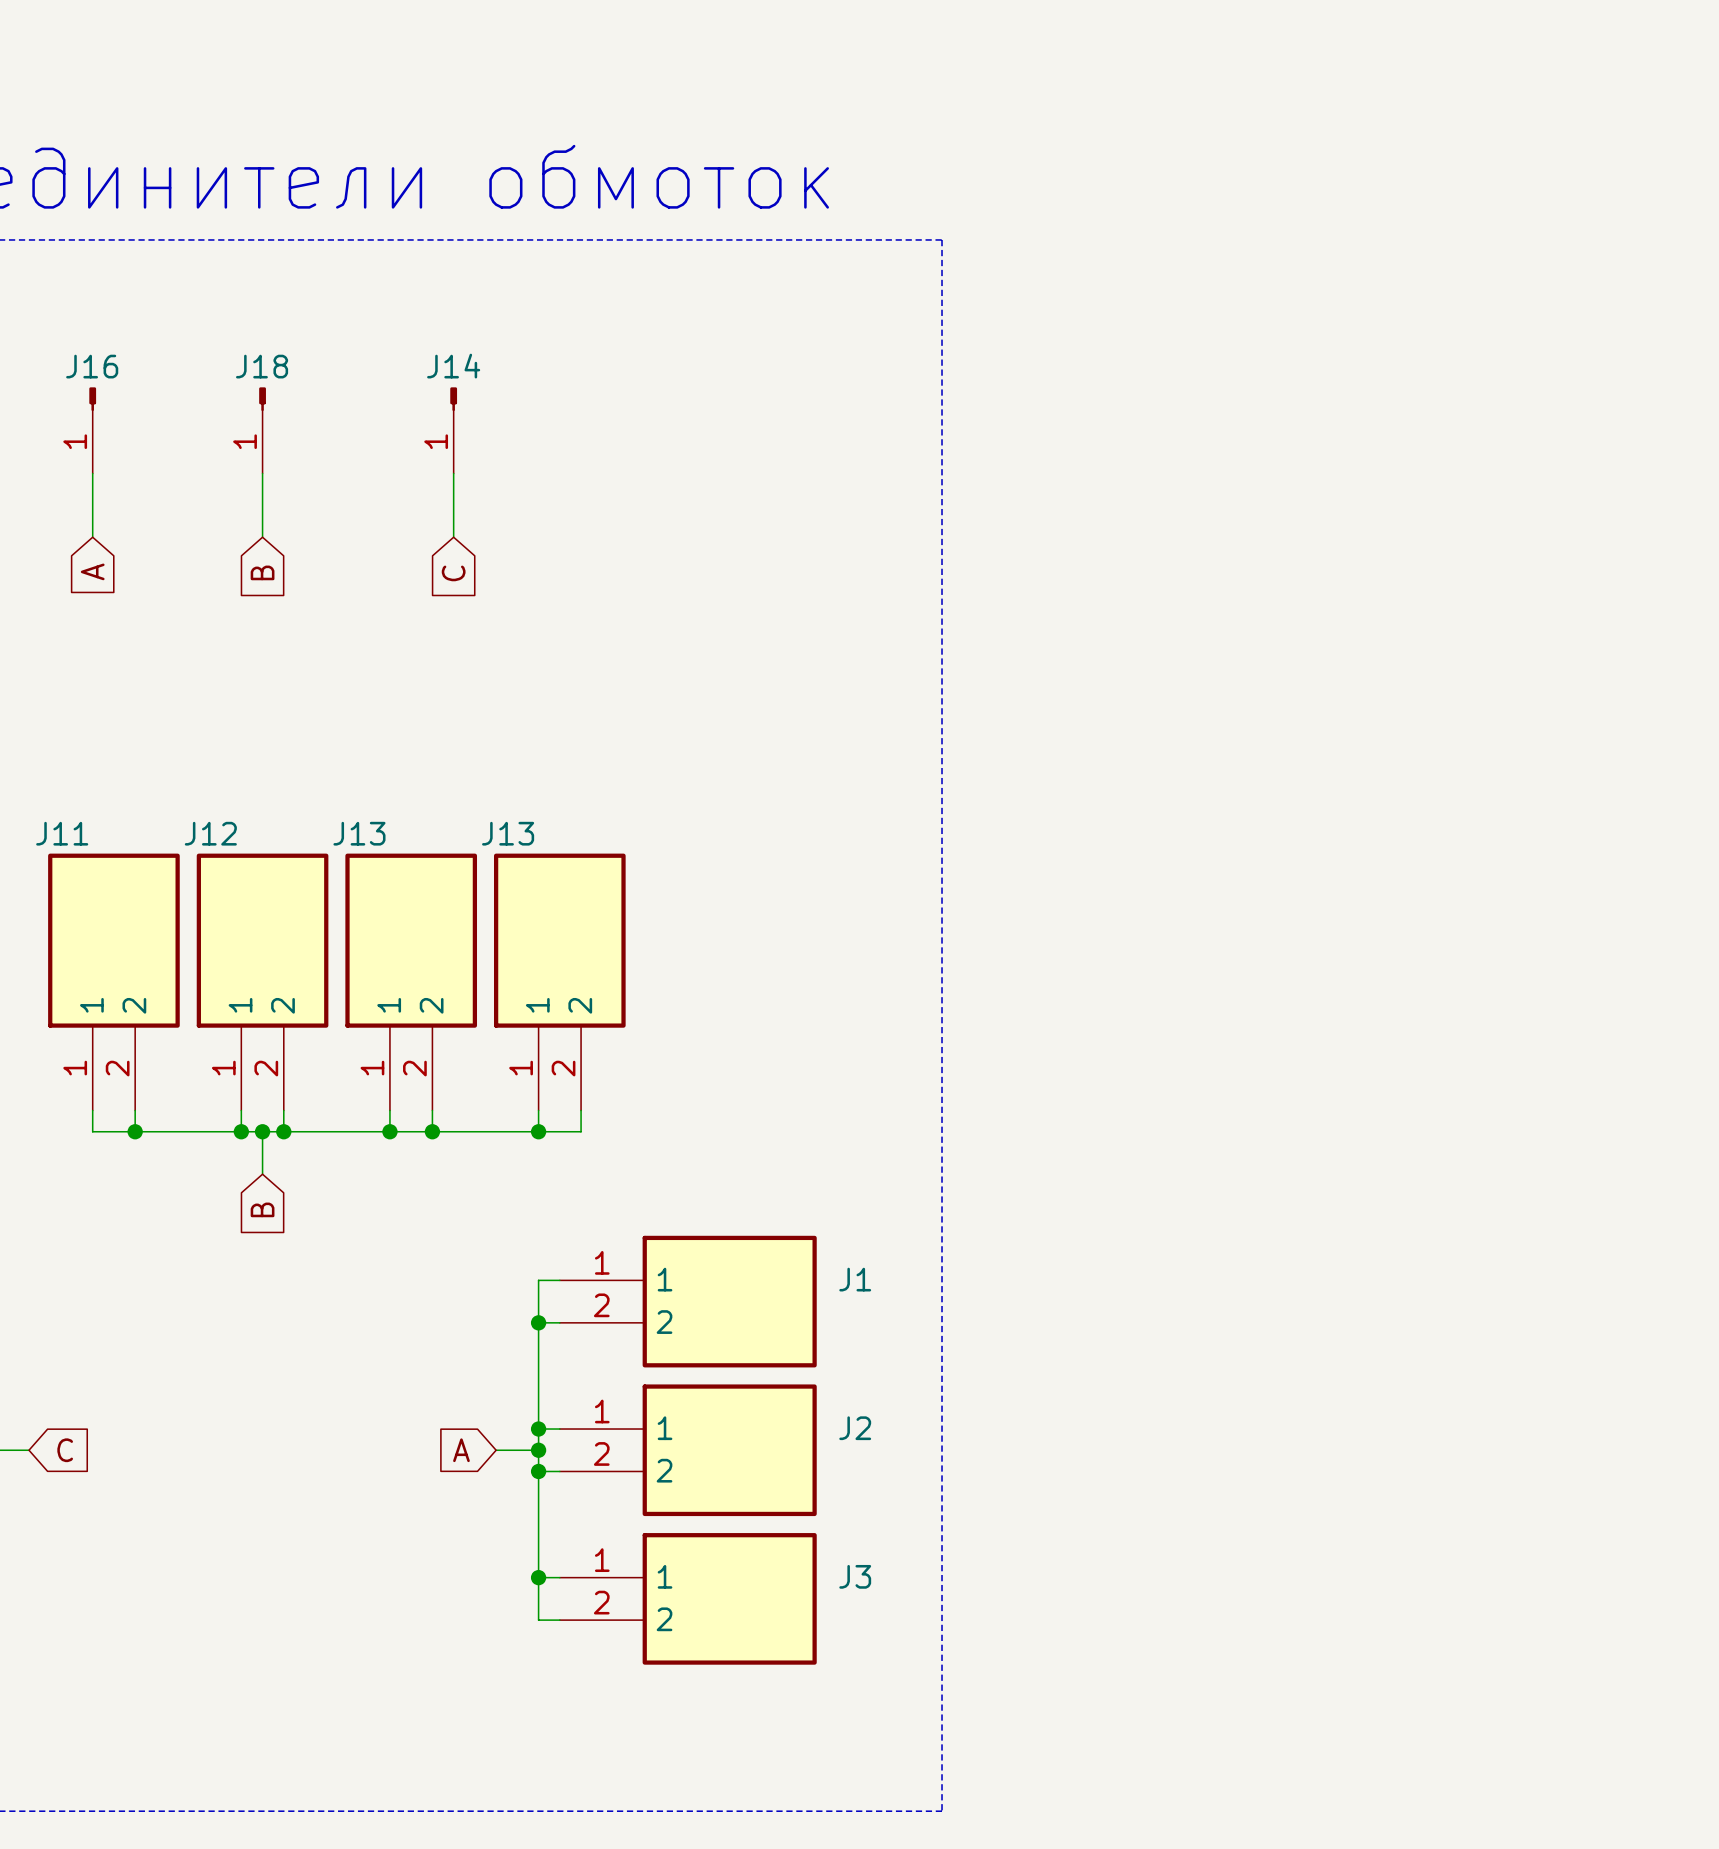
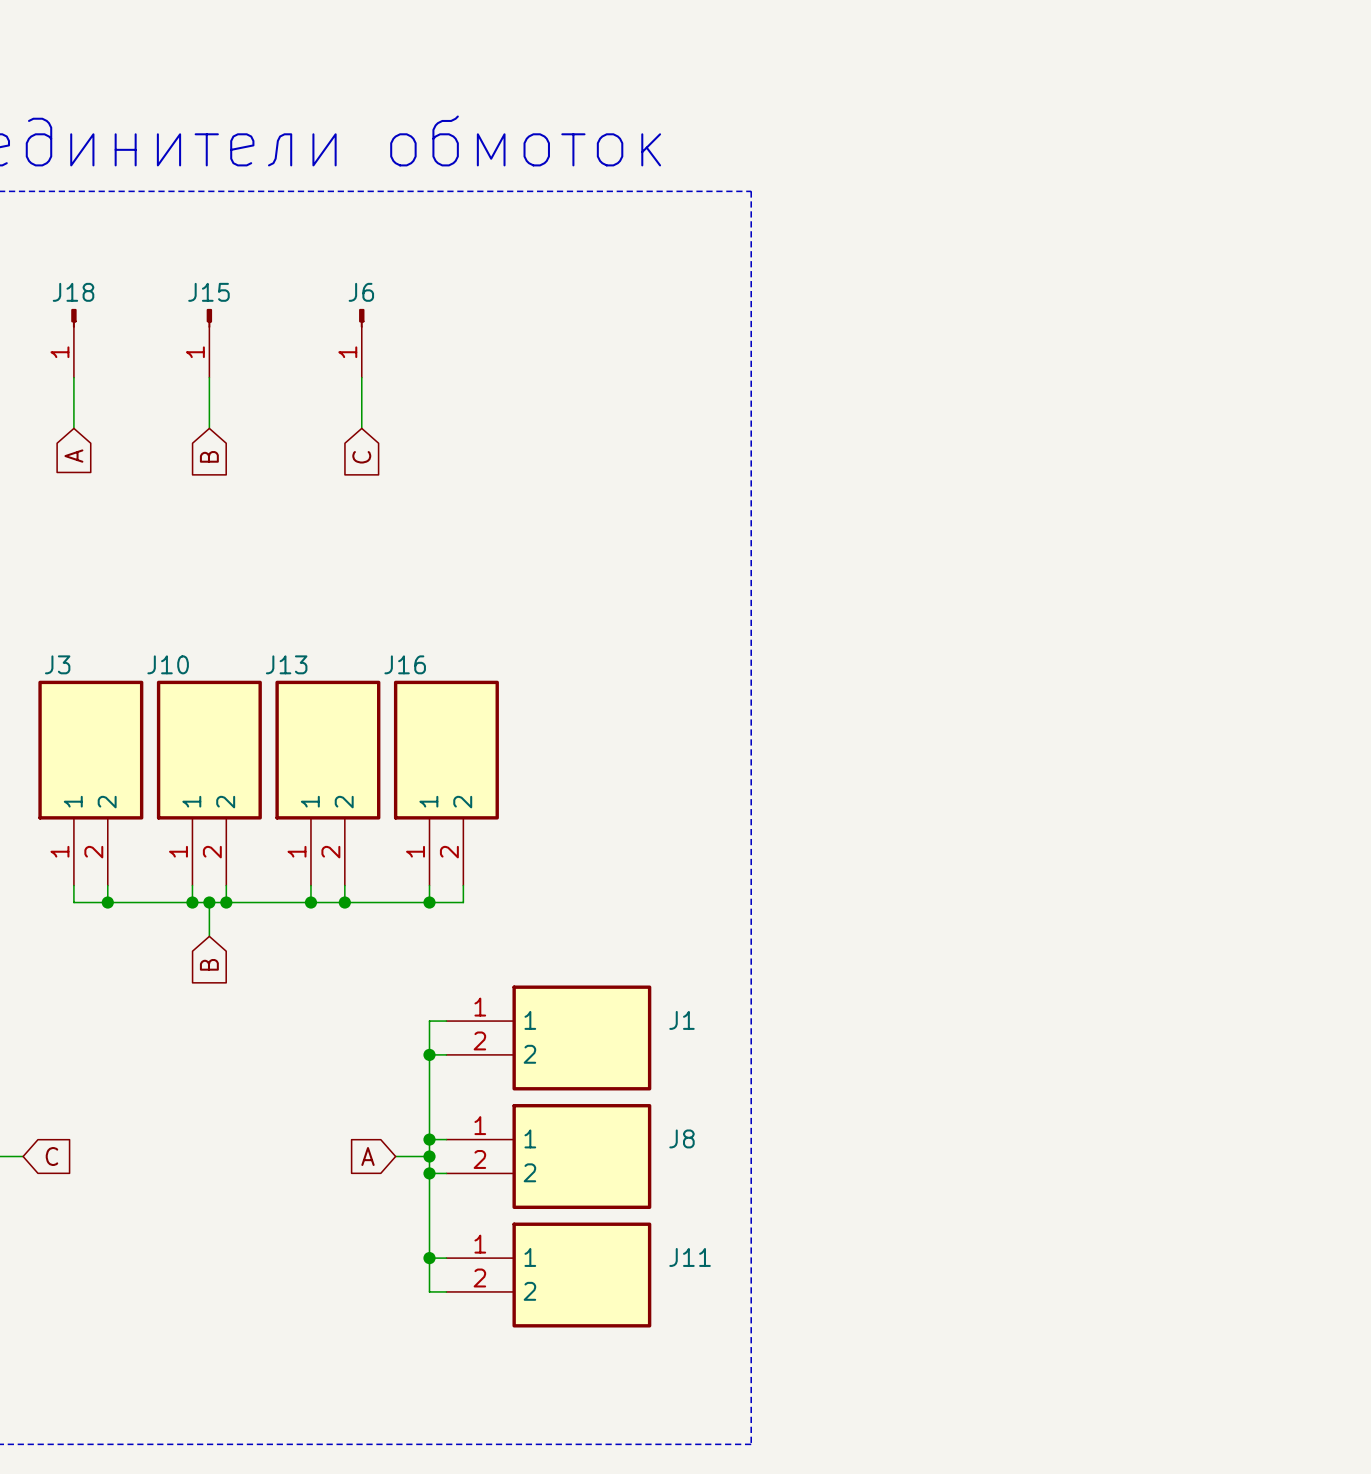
J16 name: J16 (92, 366) -> J18 (73, 292)
J18 name: J18 (262, 366) -> J15 (208, 292)
J14 name: J14 (453, 366) -> J6 (361, 292)
J11 name: J11 (62, 833) -> J3 (57, 664)
J12 name: J12 (210, 833) -> J10 (168, 664)
J13 name: J13 (508, 833) -> J16 (405, 664)
J2 name: J2 (855, 1428) -> J8 (681, 1138)
J3 name: J3 (855, 1576) -> J11 (690, 1257)

